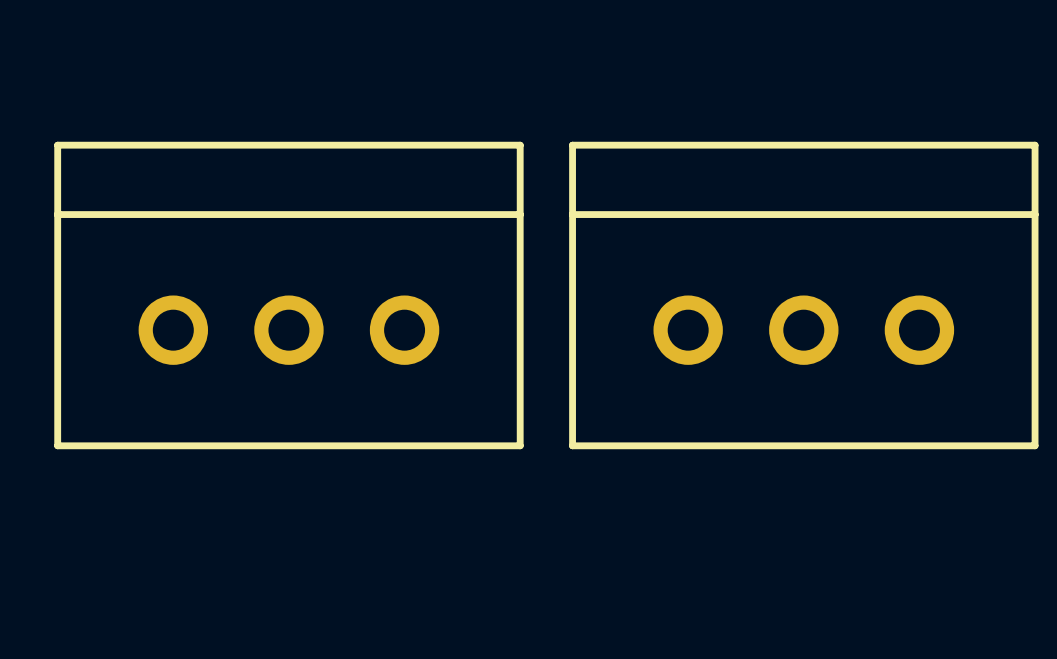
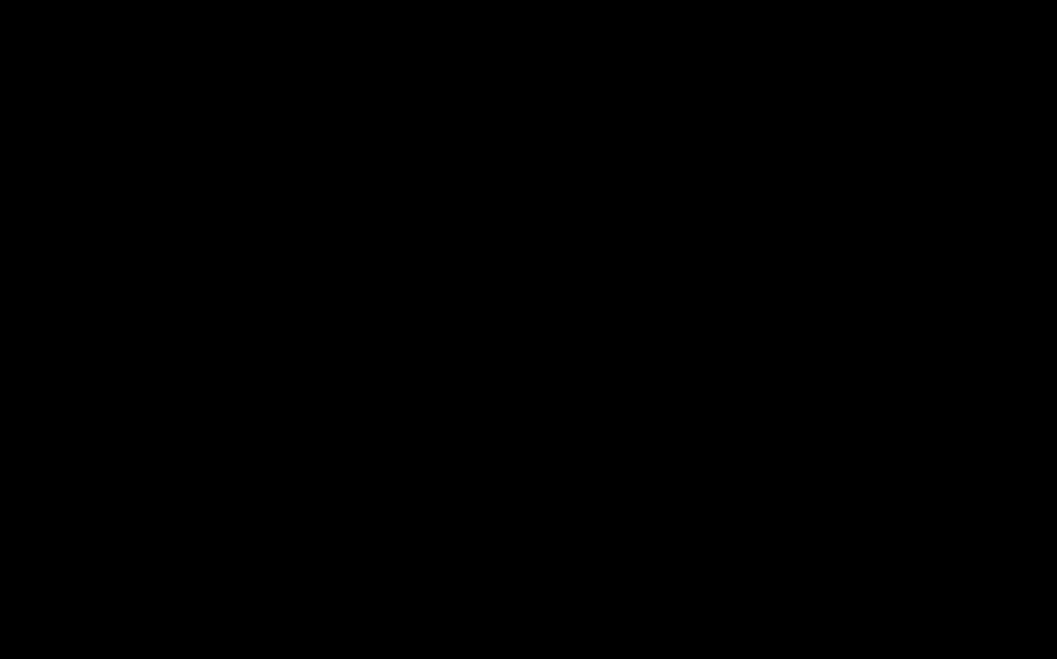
part: (288, 295) -> none
part: (803, 295) -> none

